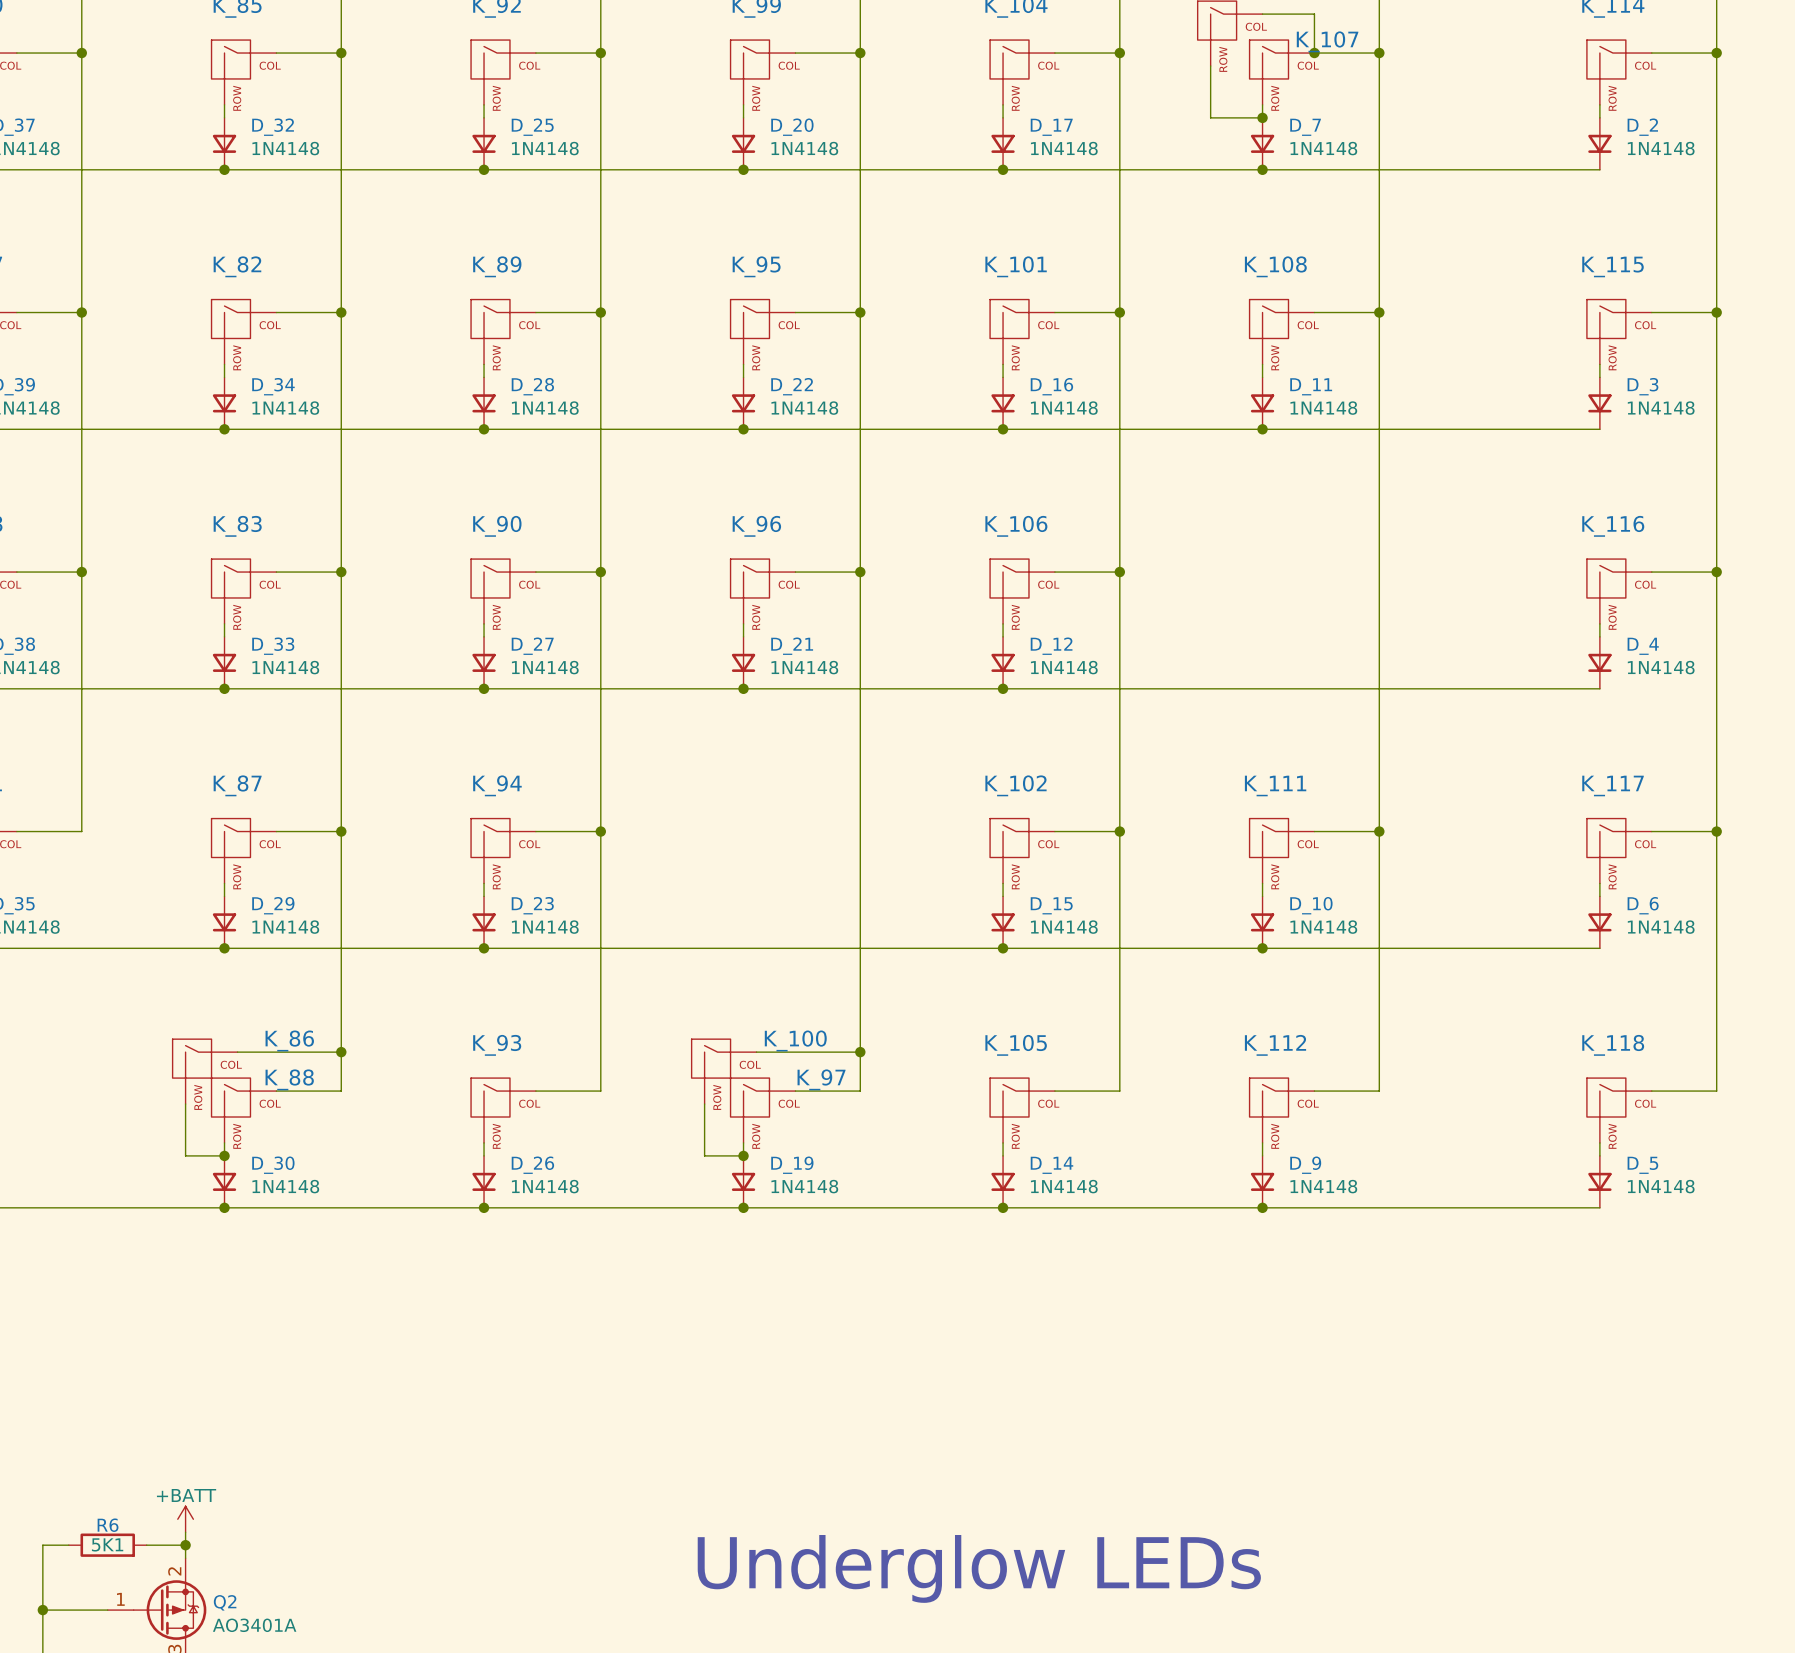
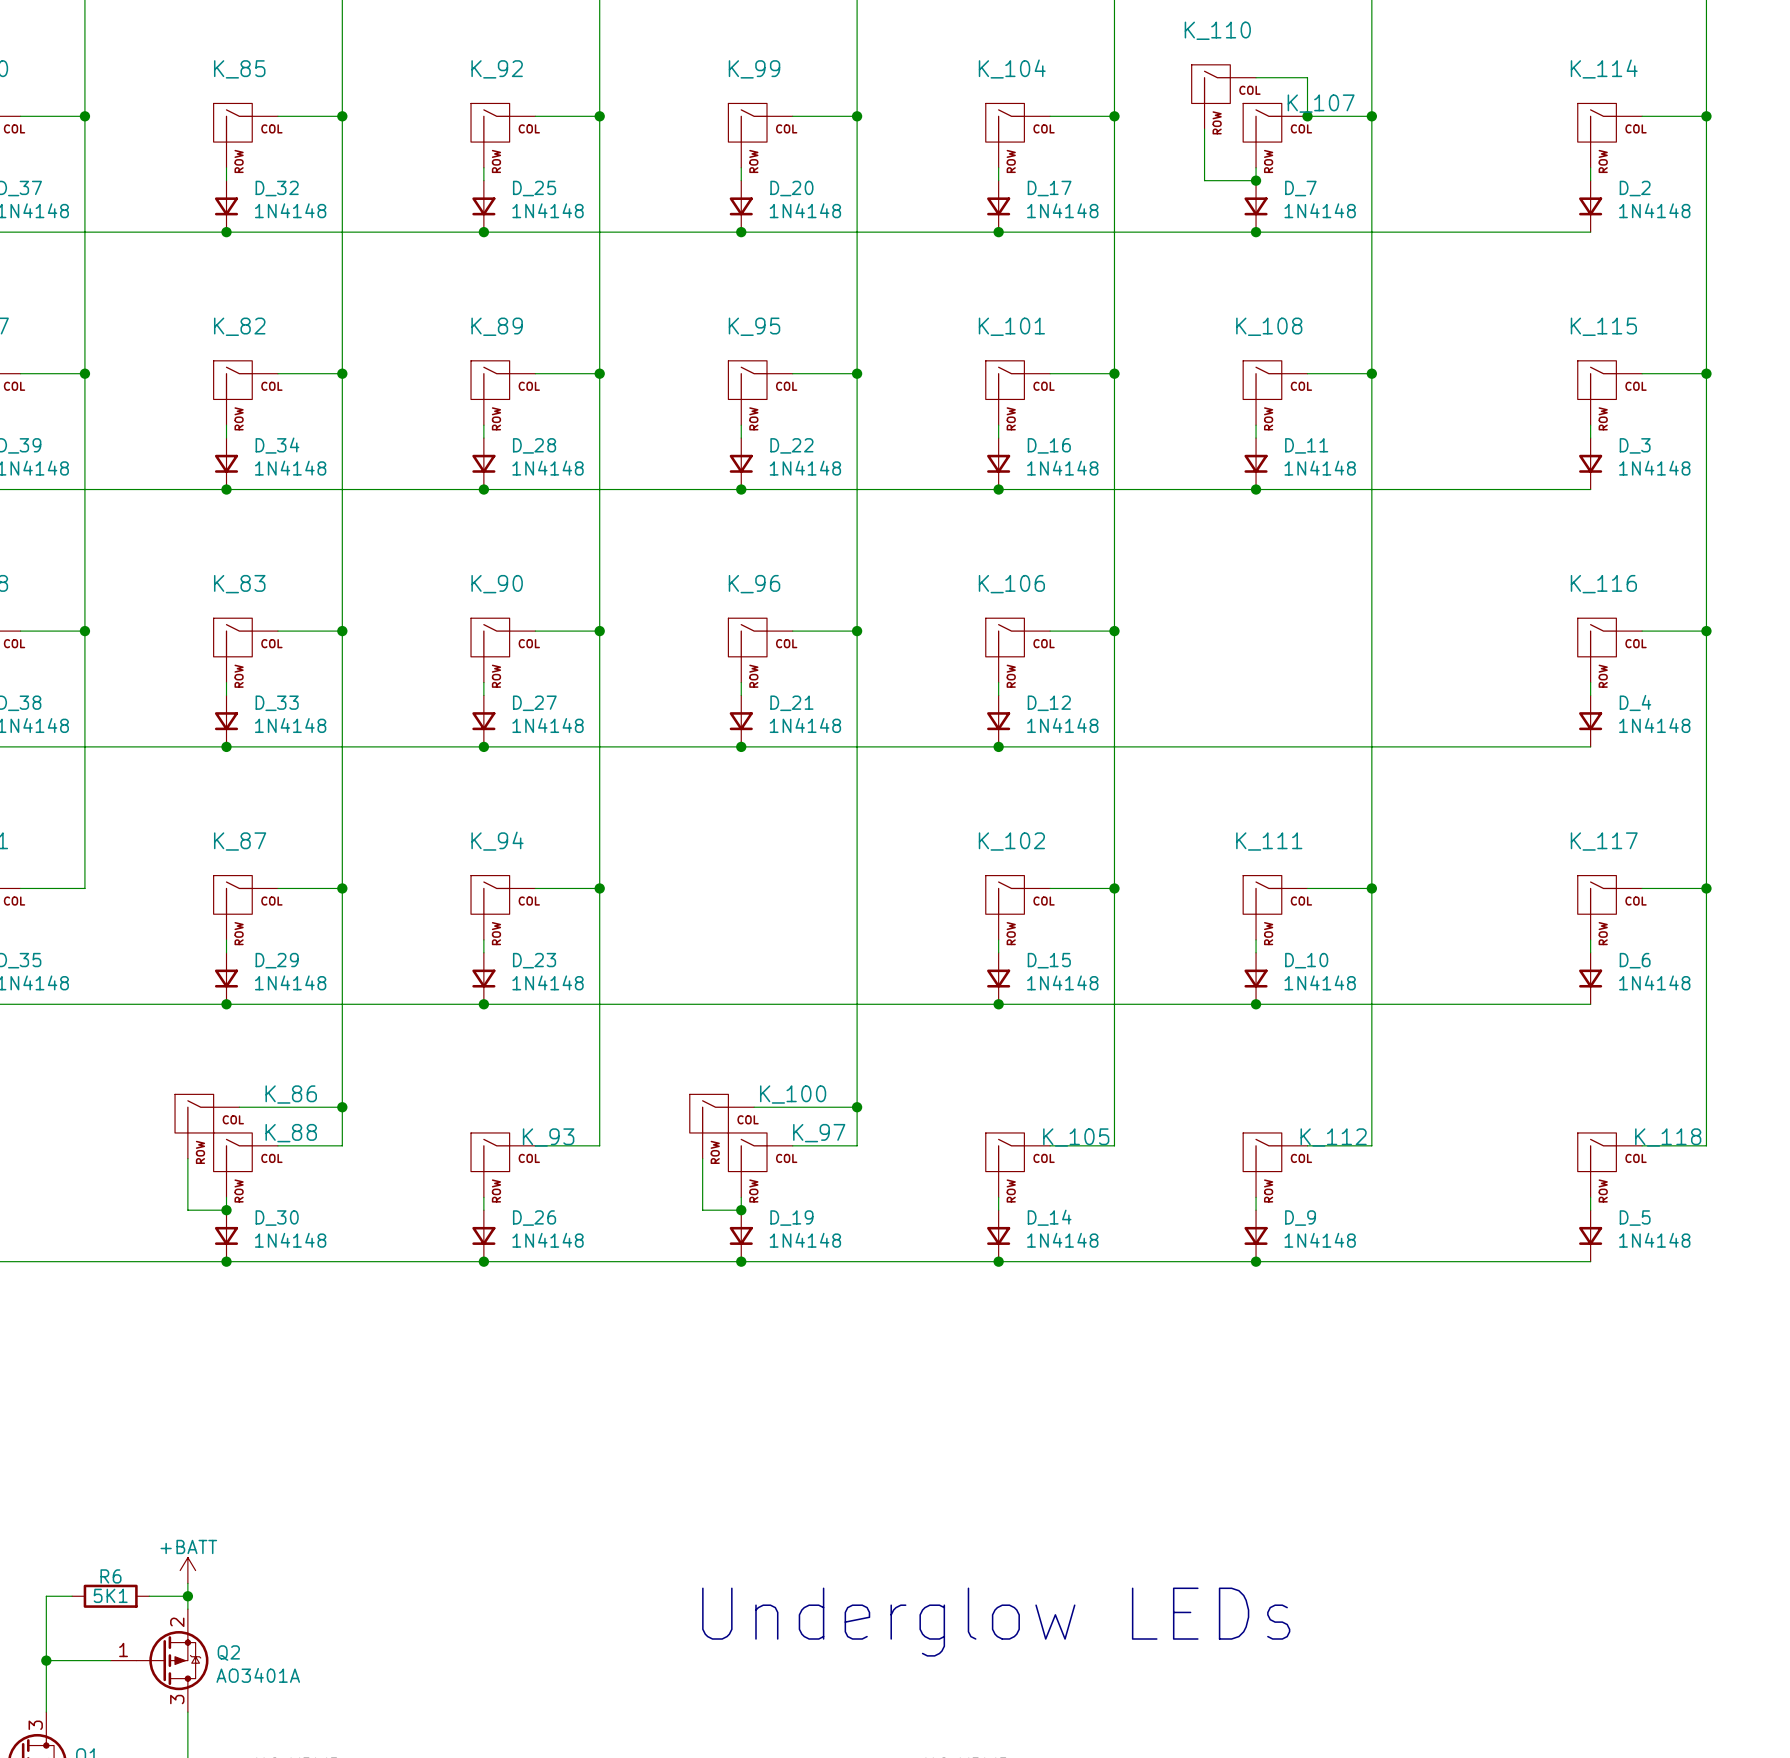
K_93 name position: K_93 (497, 1045) -> K_93 (548, 1137)
K_105 name position: K_105 (1016, 1045) -> K_105 (1076, 1137)
K_112 name position: K_112 (1275, 1045) -> K_112 (1333, 1137)
K_118 name position: K_118 (1613, 1045) -> K_118 (1668, 1137)

